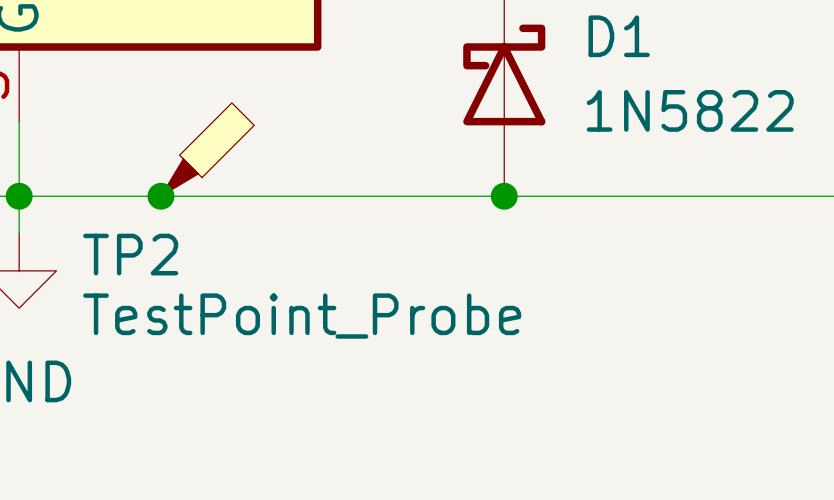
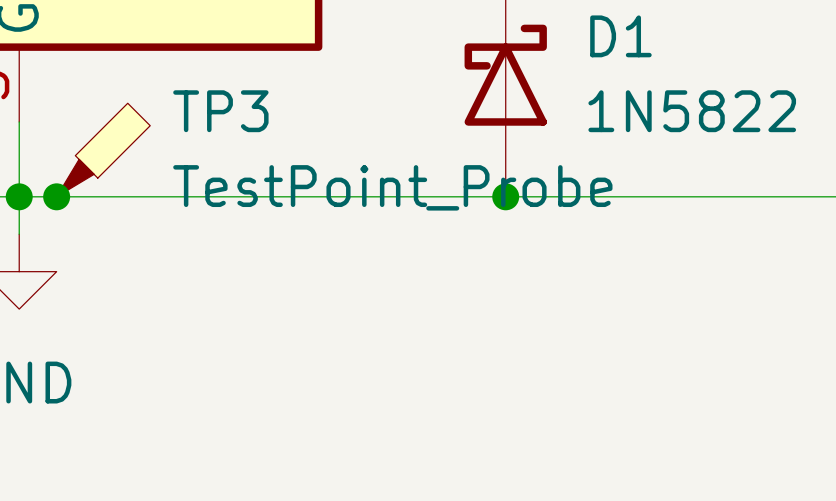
TP3: none -> TestPoint_Probe (103, 150)
TP2: TestPoint_Probe (207, 149) -> none
junction position: (160, 196) -> (56, 196)

